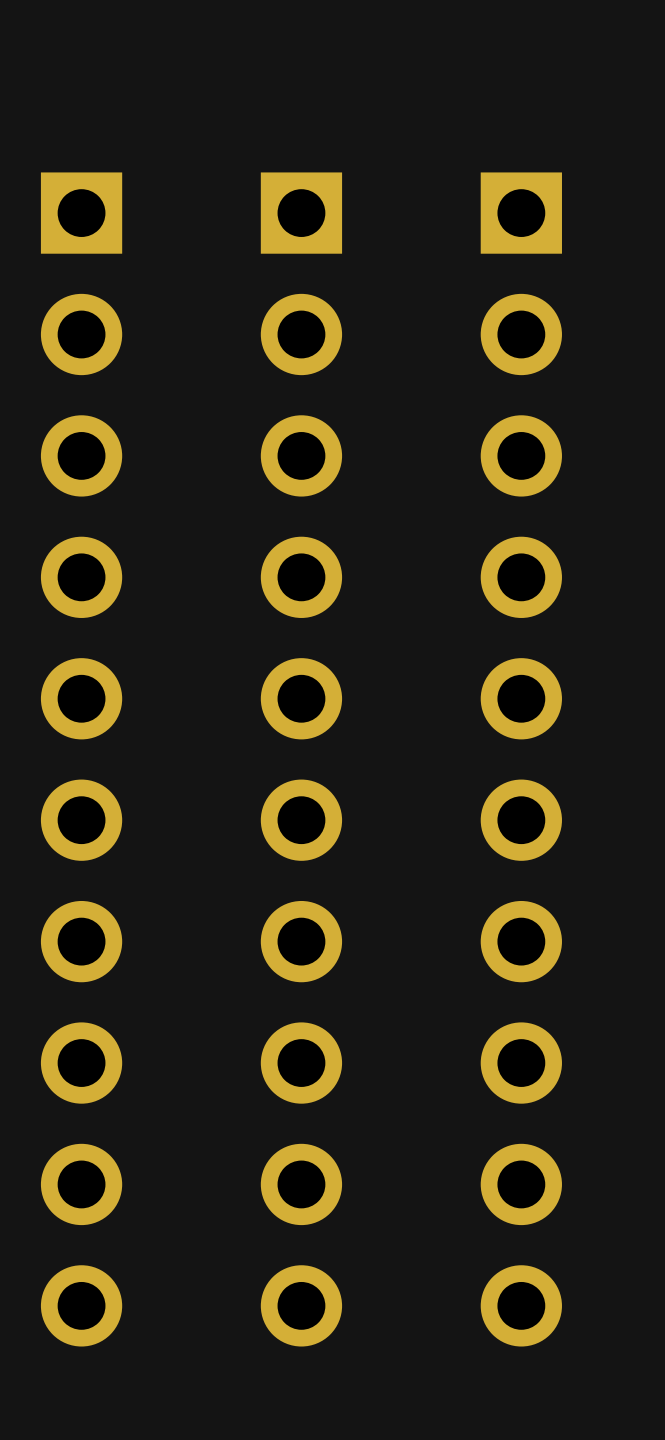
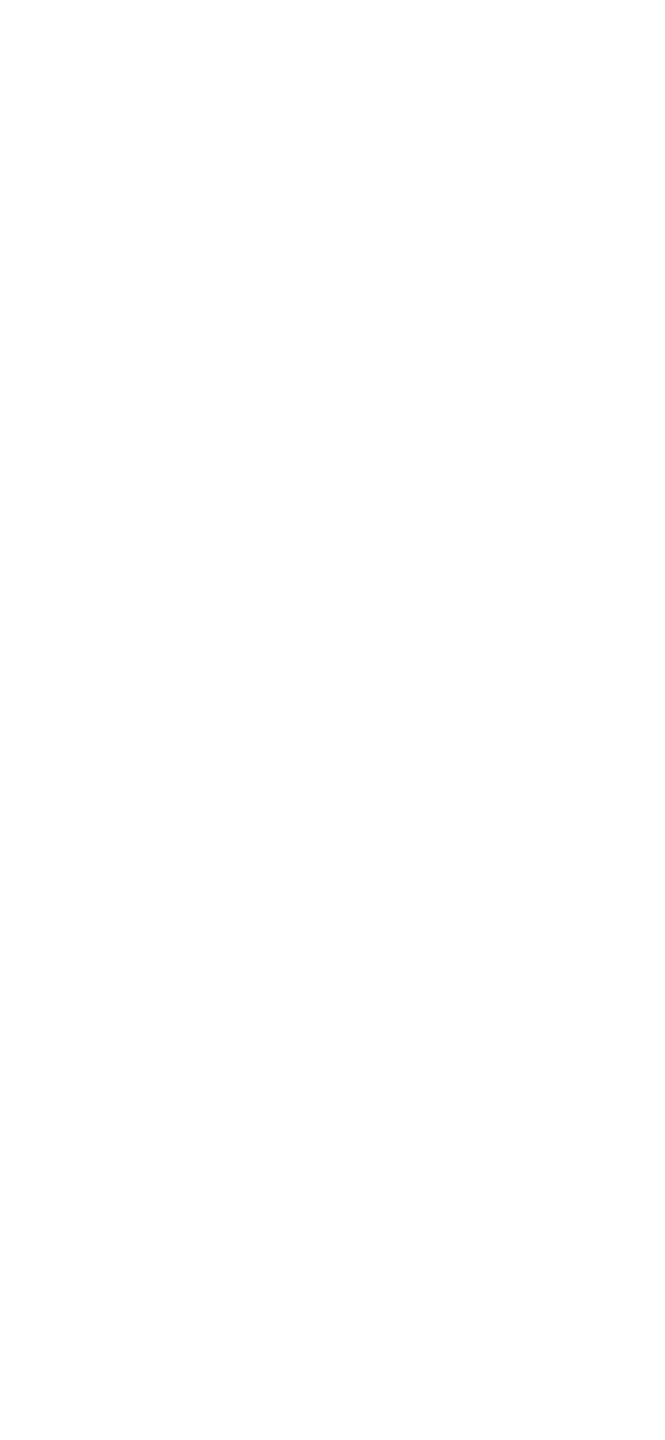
part: (81, 759) -> none
part: (301, 759) -> none
part: (521, 759) -> none

